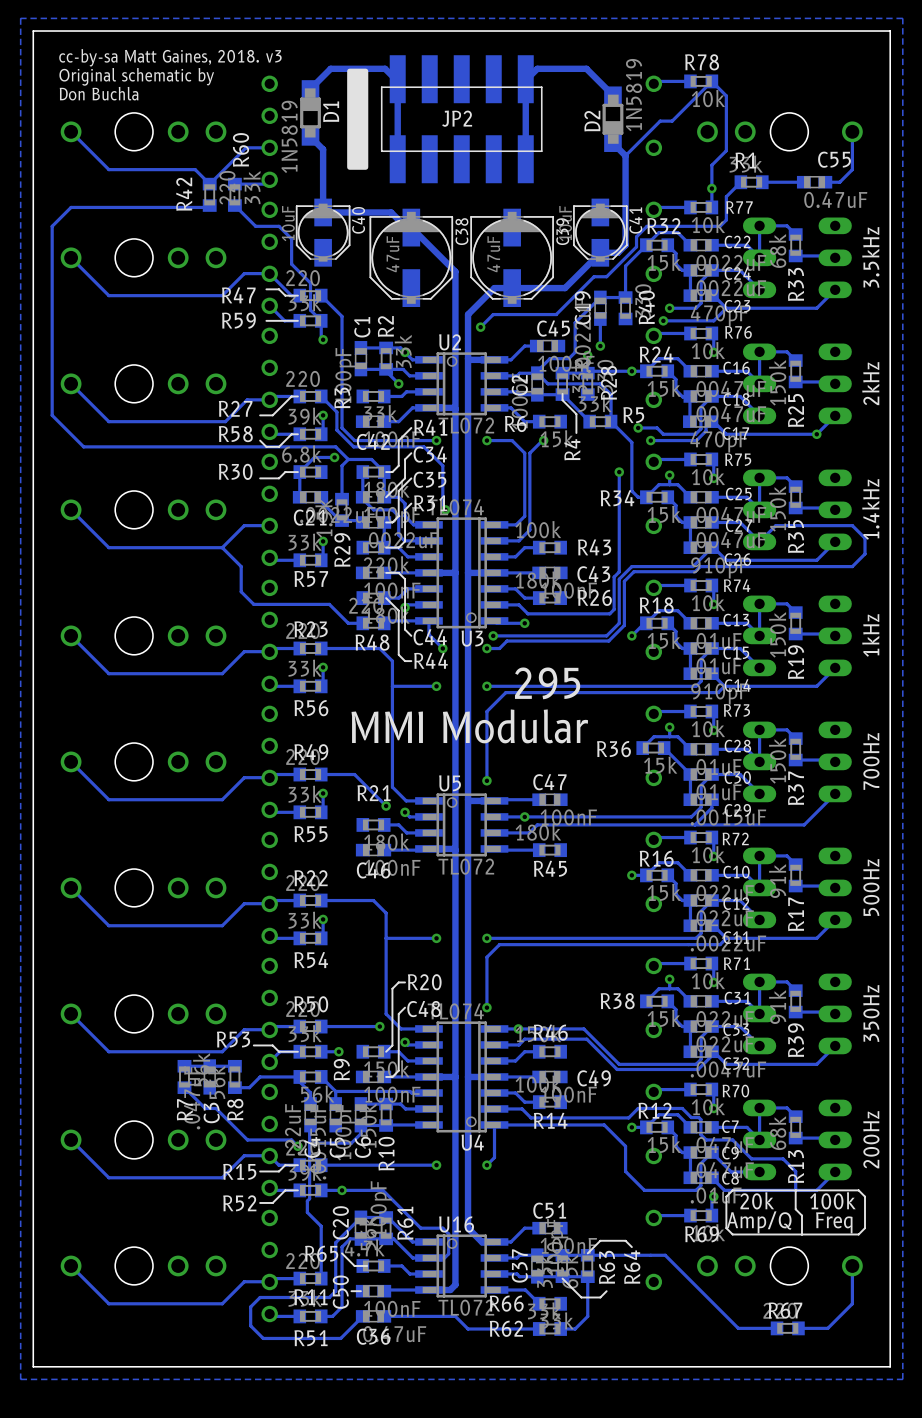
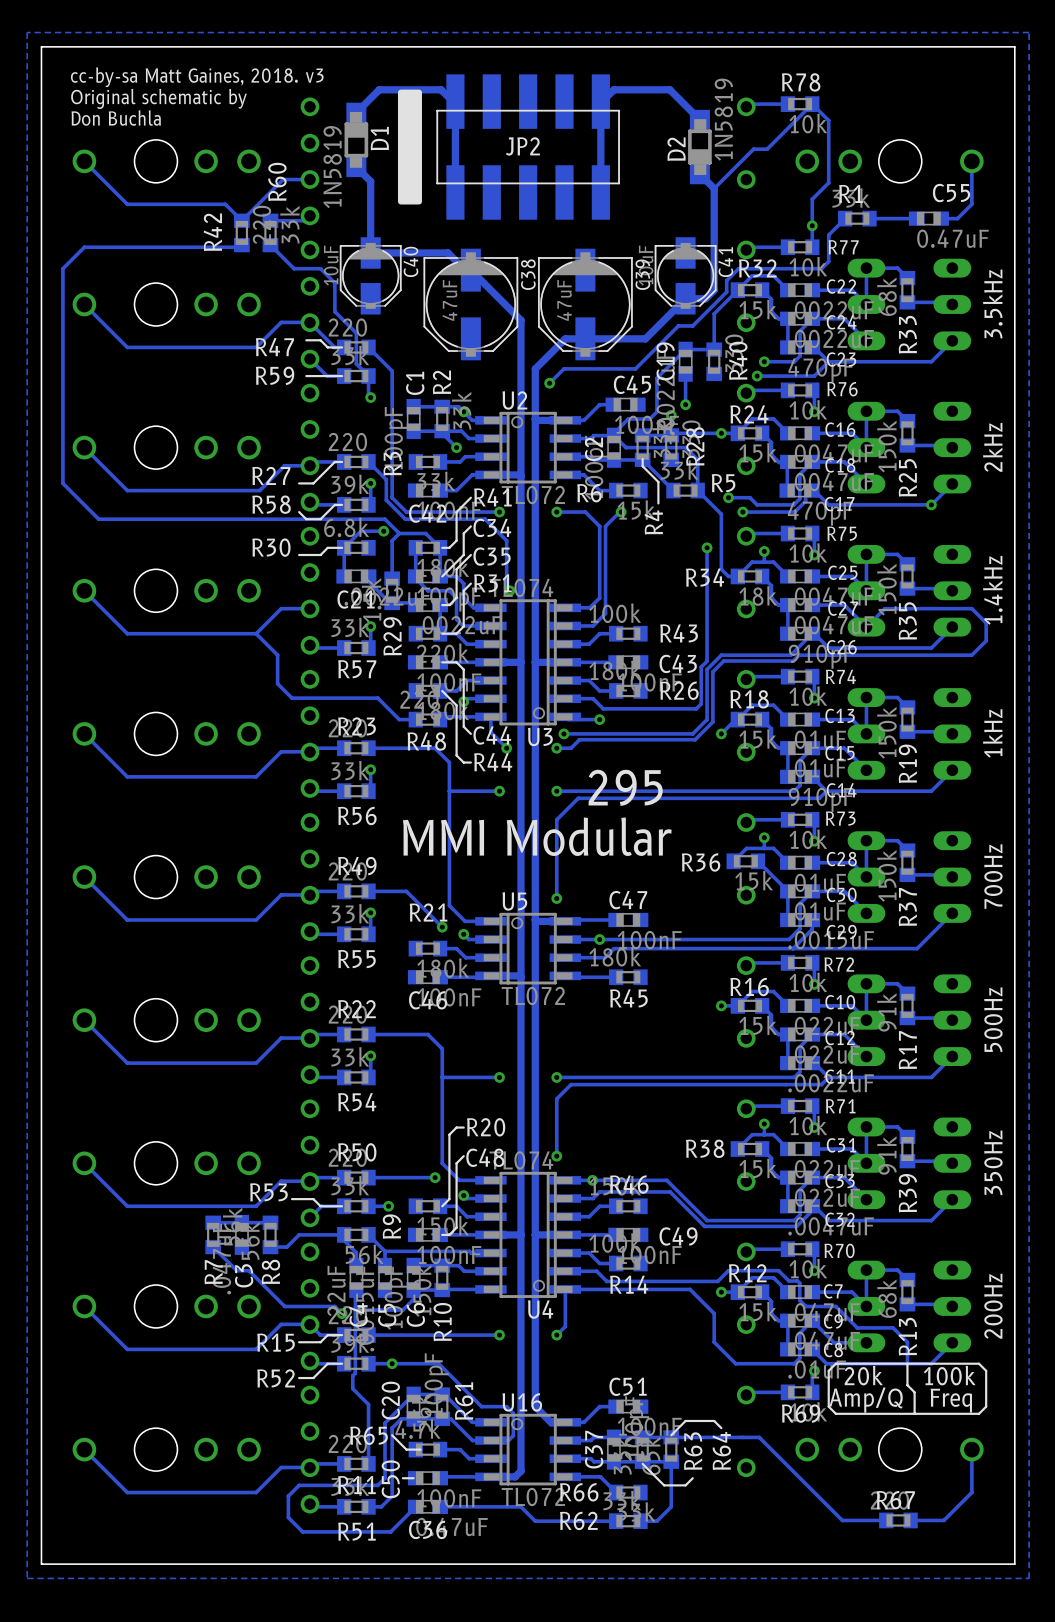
R34 value: 15k (664, 514) -> 18k (758, 595)

